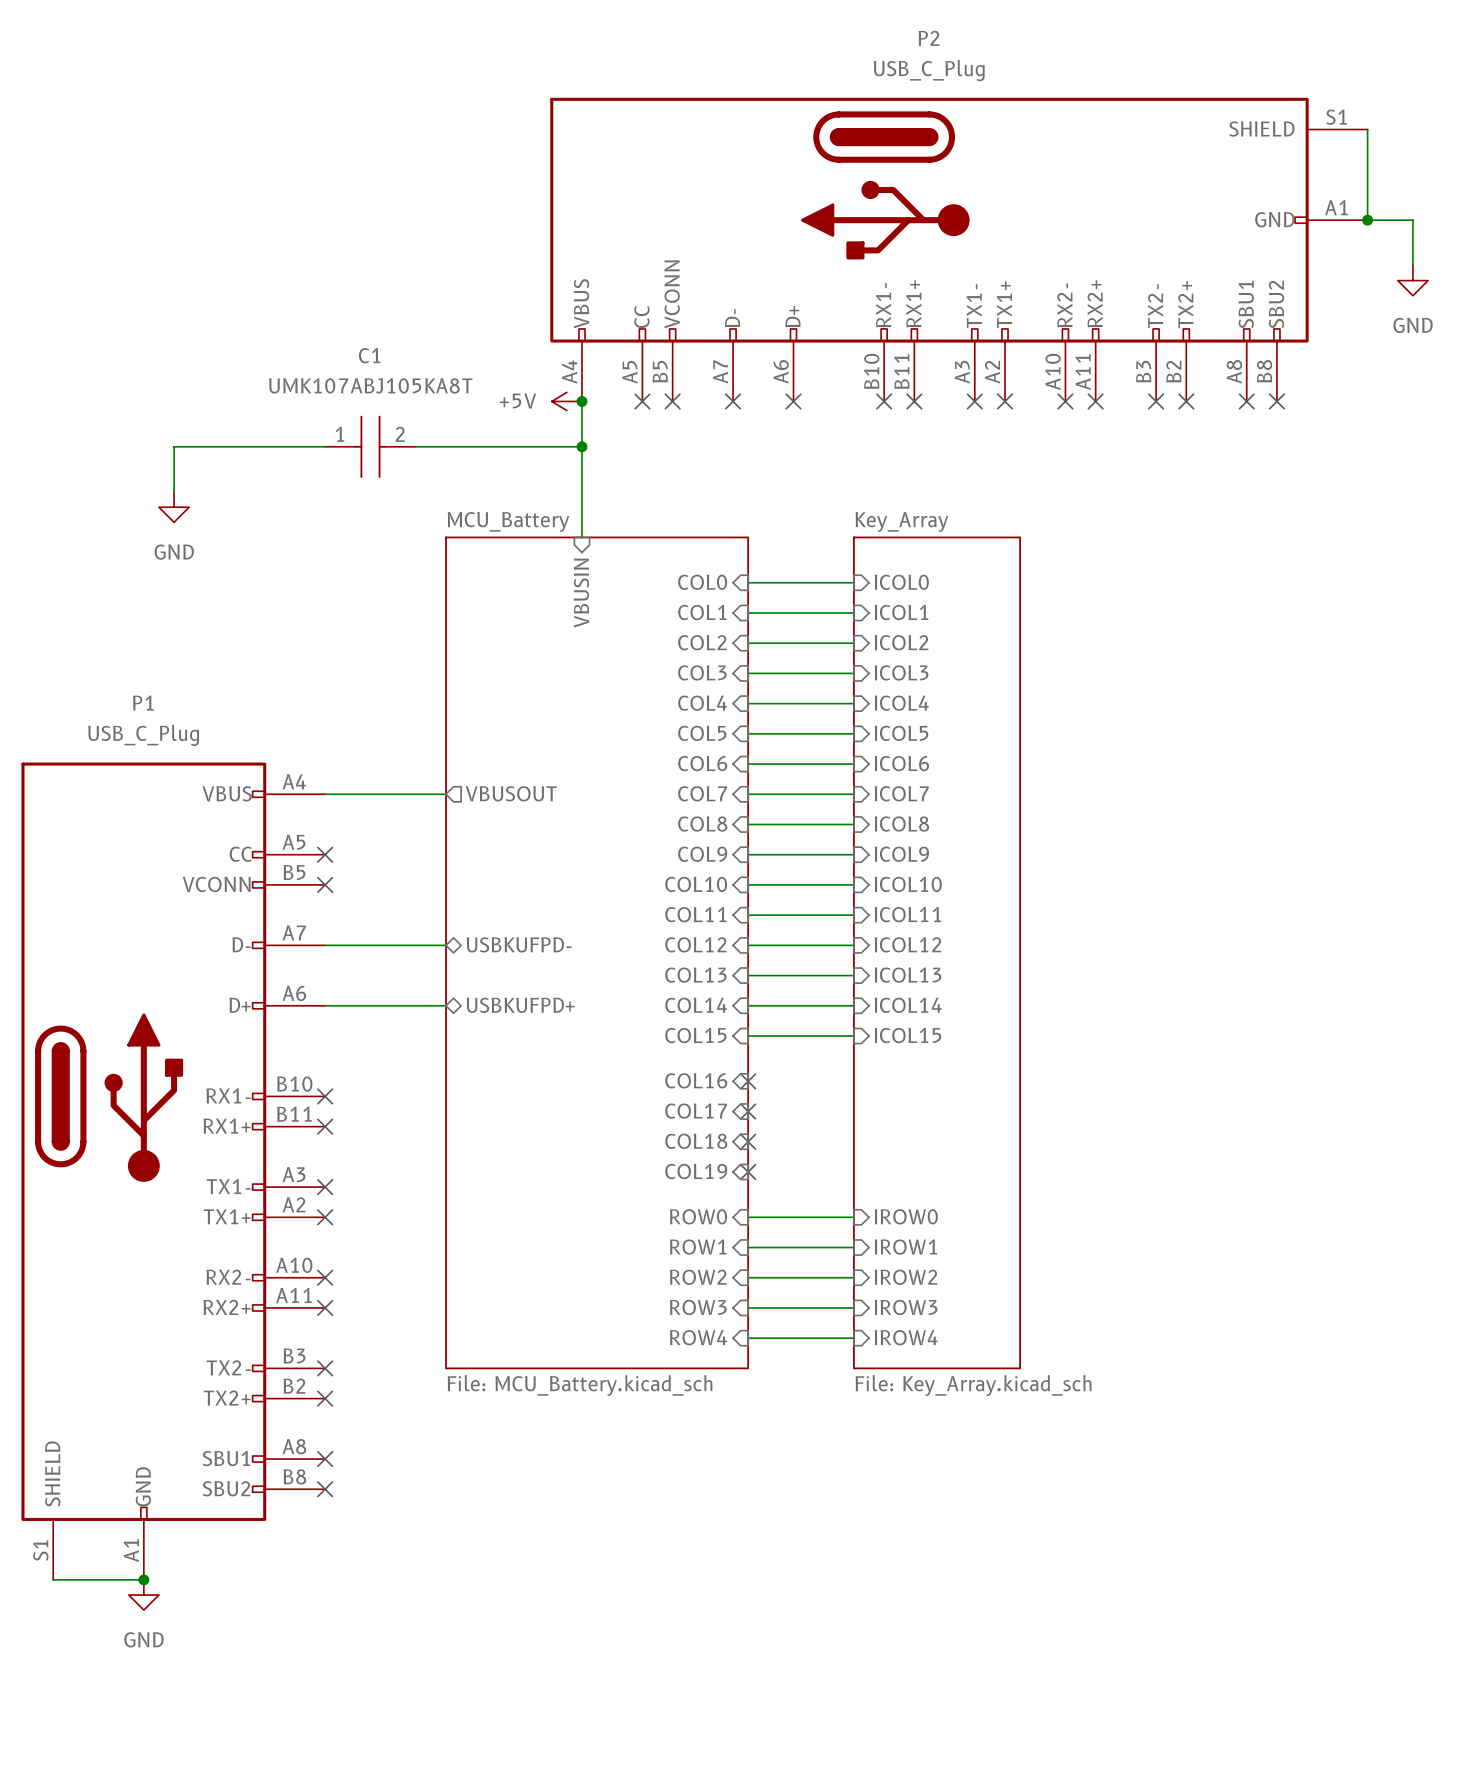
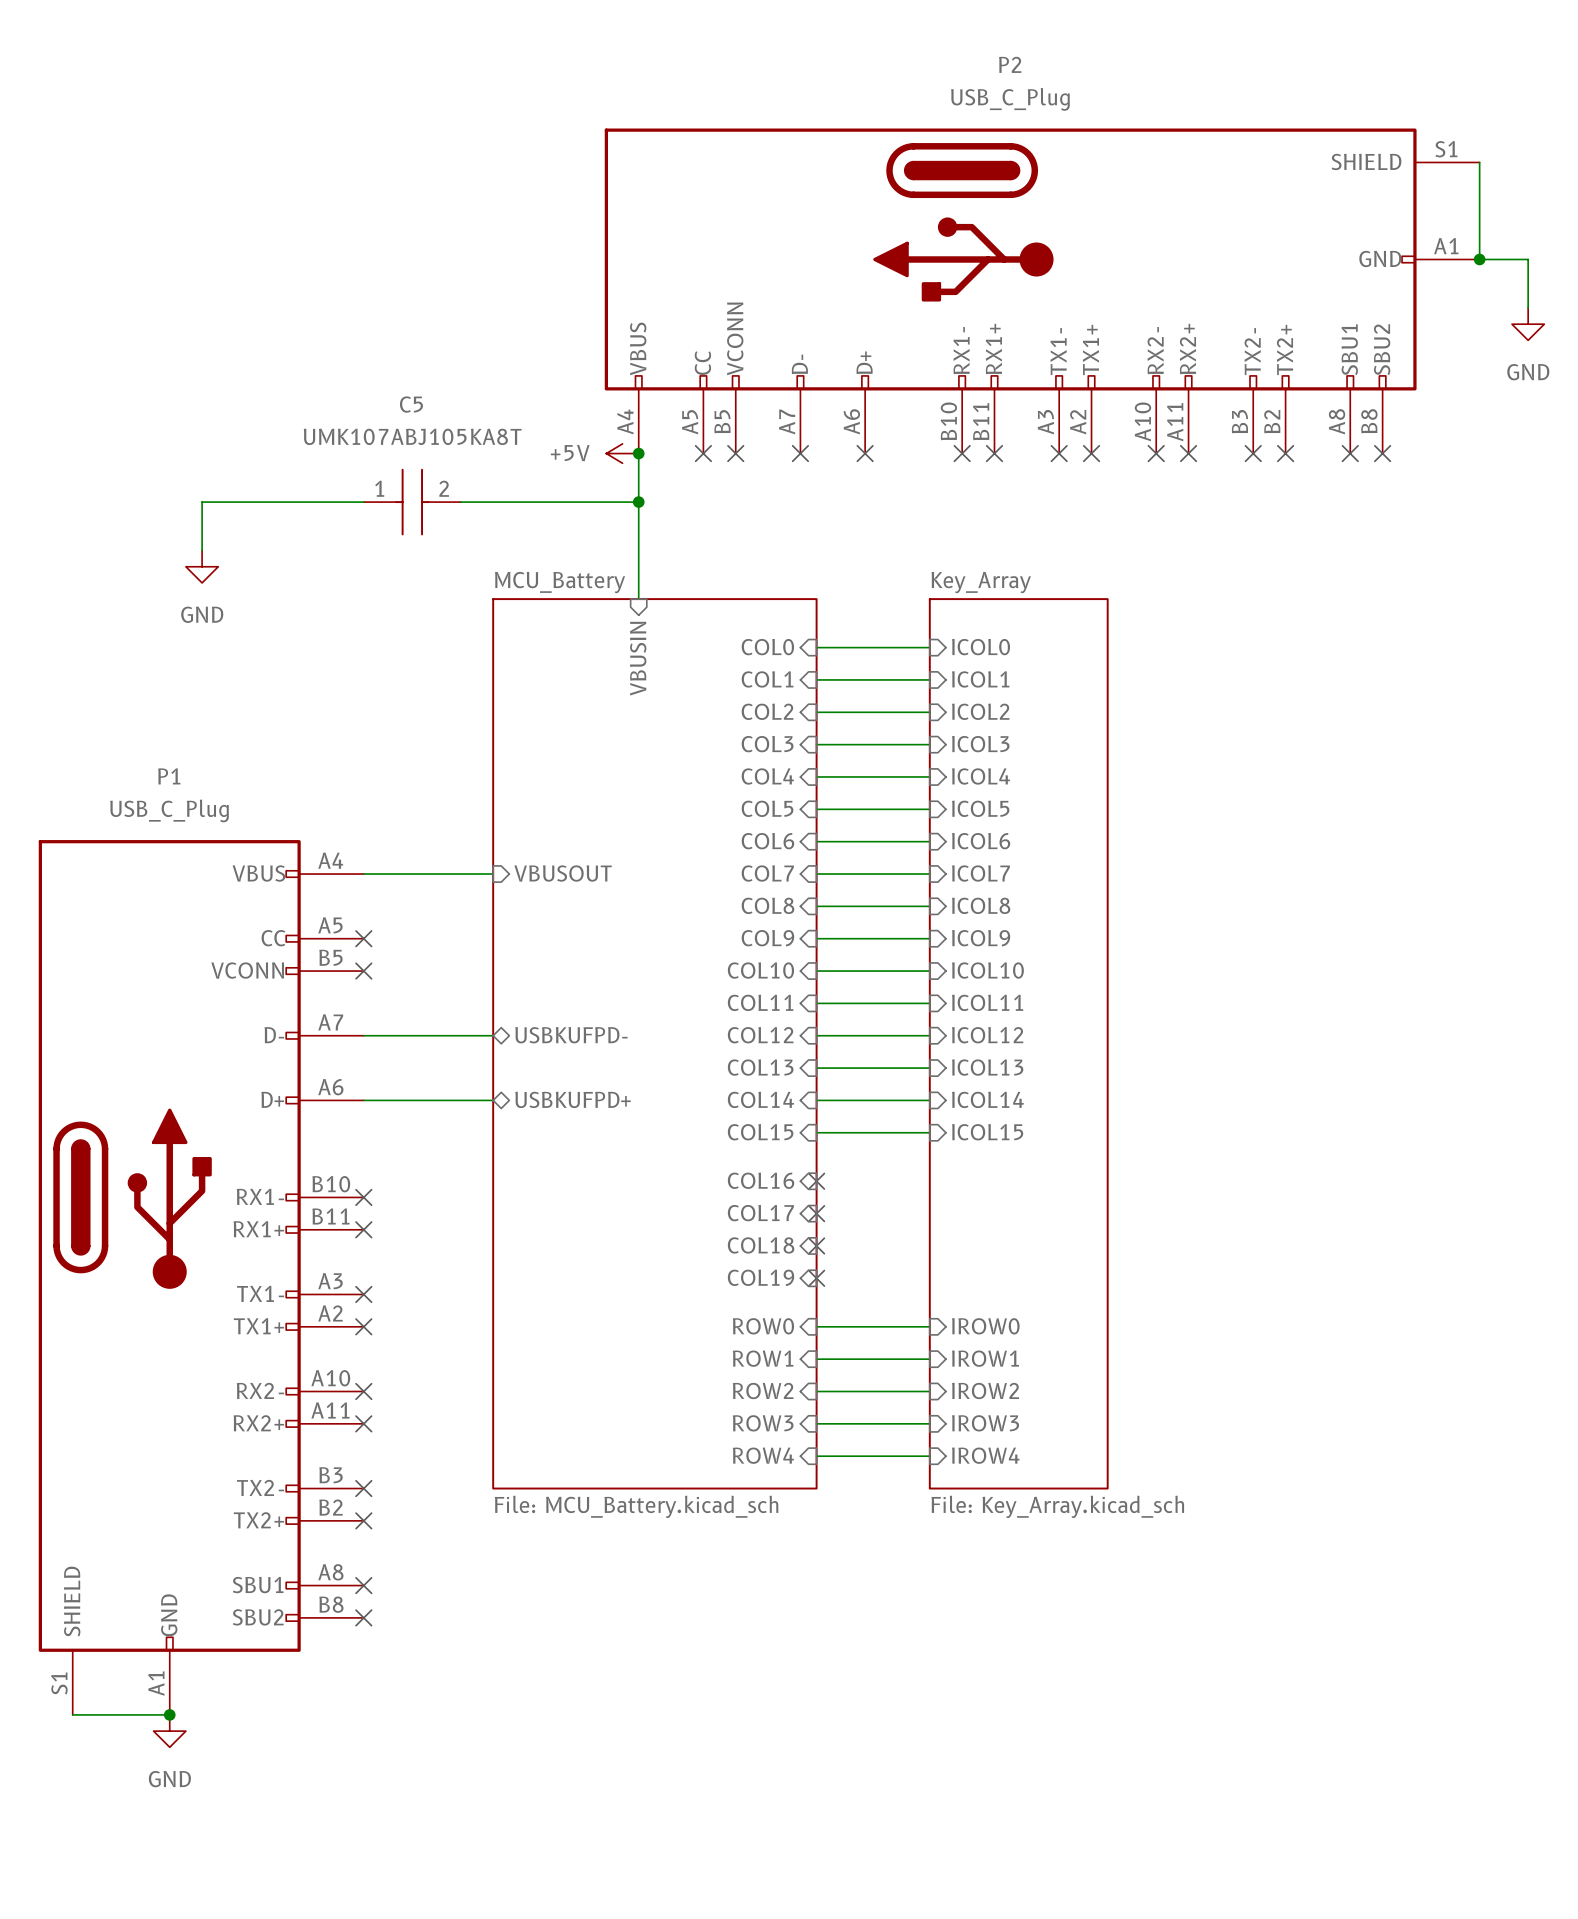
C1 name: C1 (369, 355) -> C5 (411, 404)
sheet pin shape: output (511, 793) -> input (563, 873)

